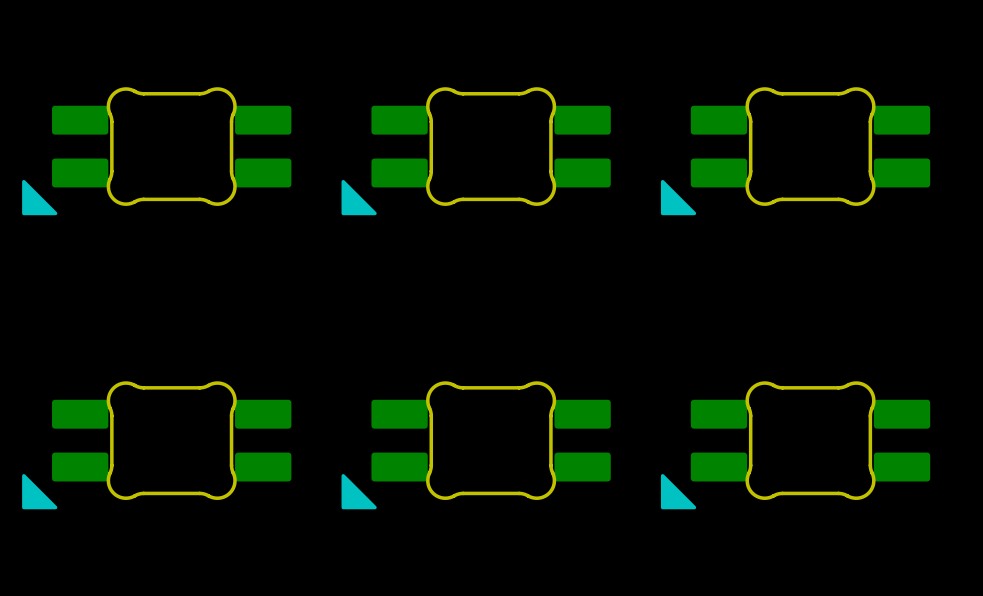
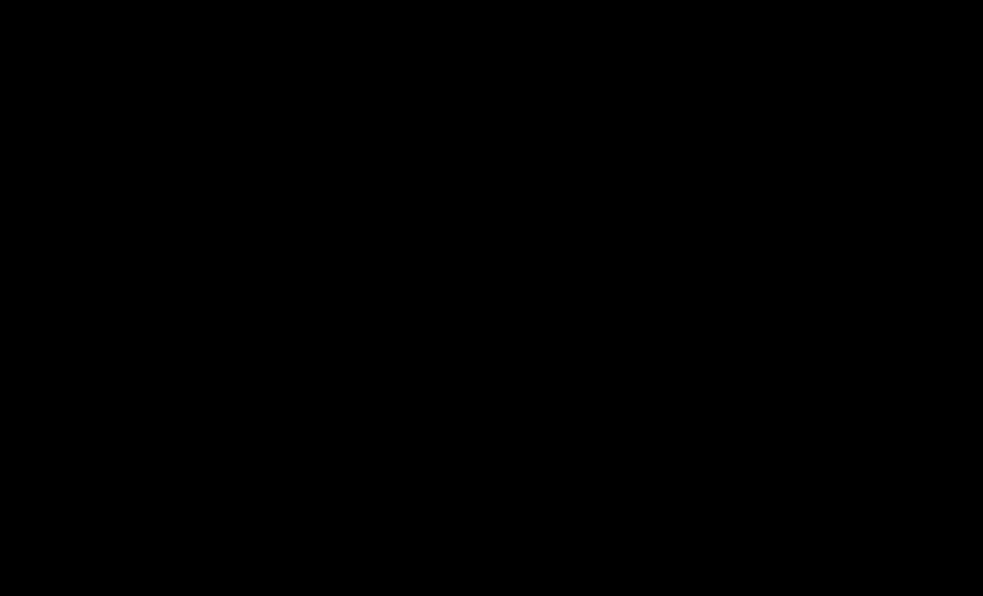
part: (156, 151) -> none
part: (476, 151) -> none
part: (795, 151) -> none
part: (156, 445) -> none
part: (476, 445) -> none
part: (795, 445) -> none

